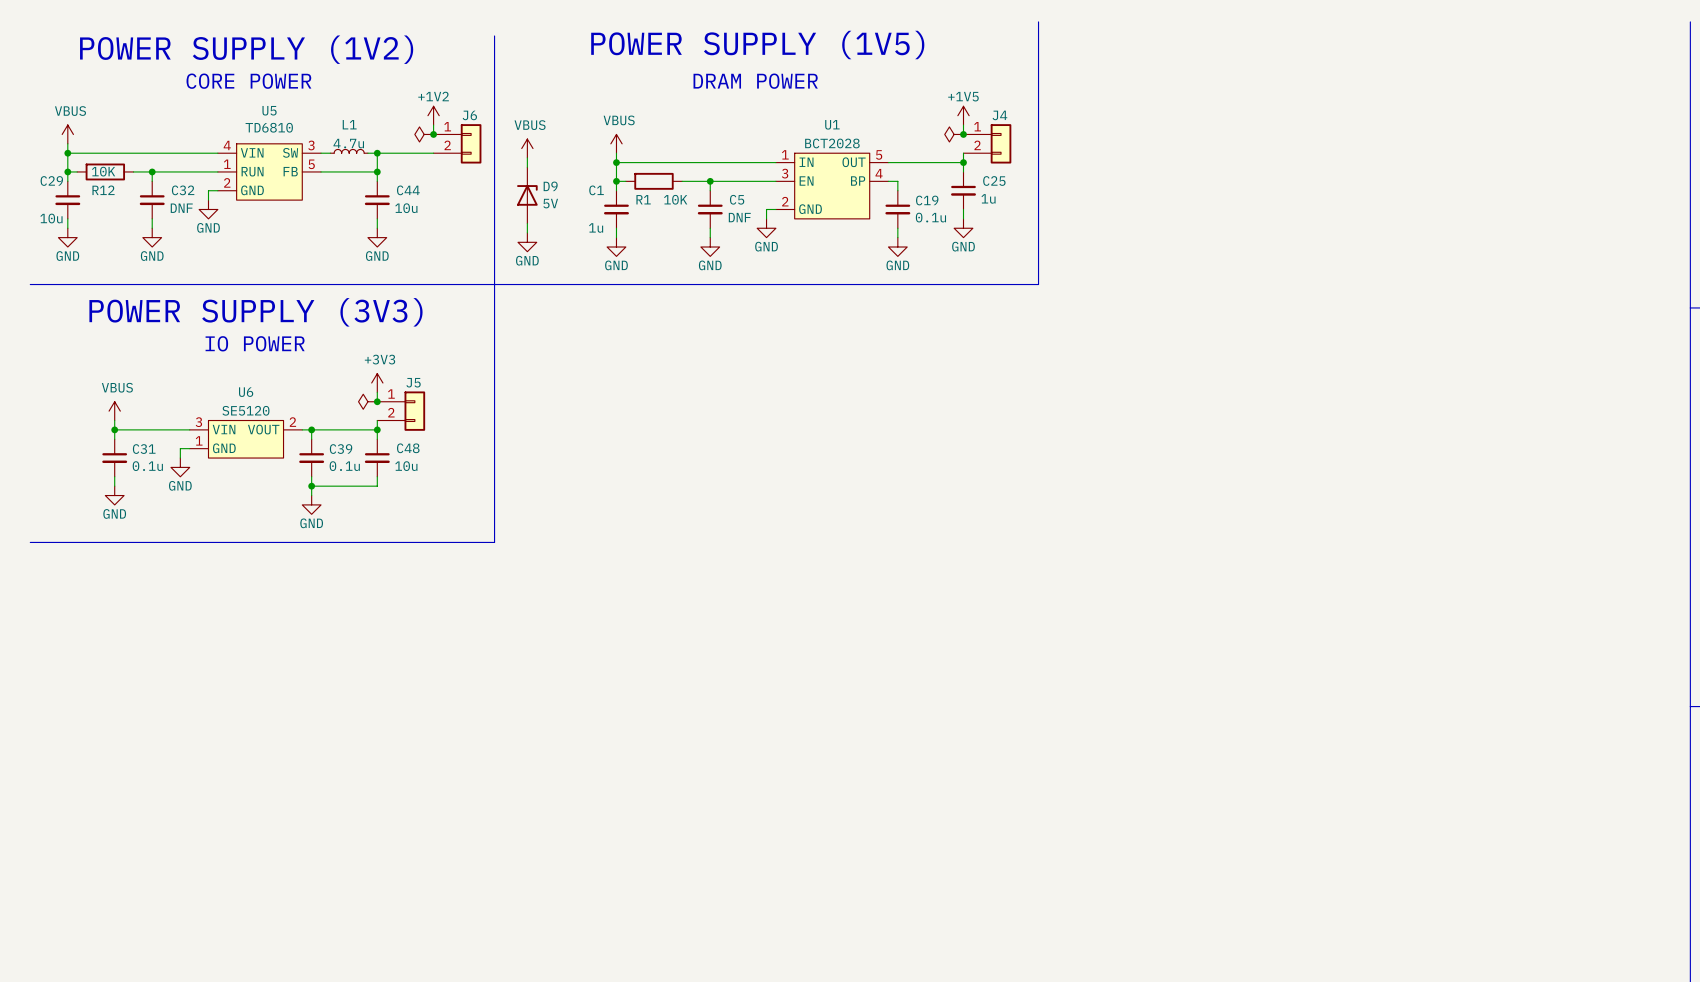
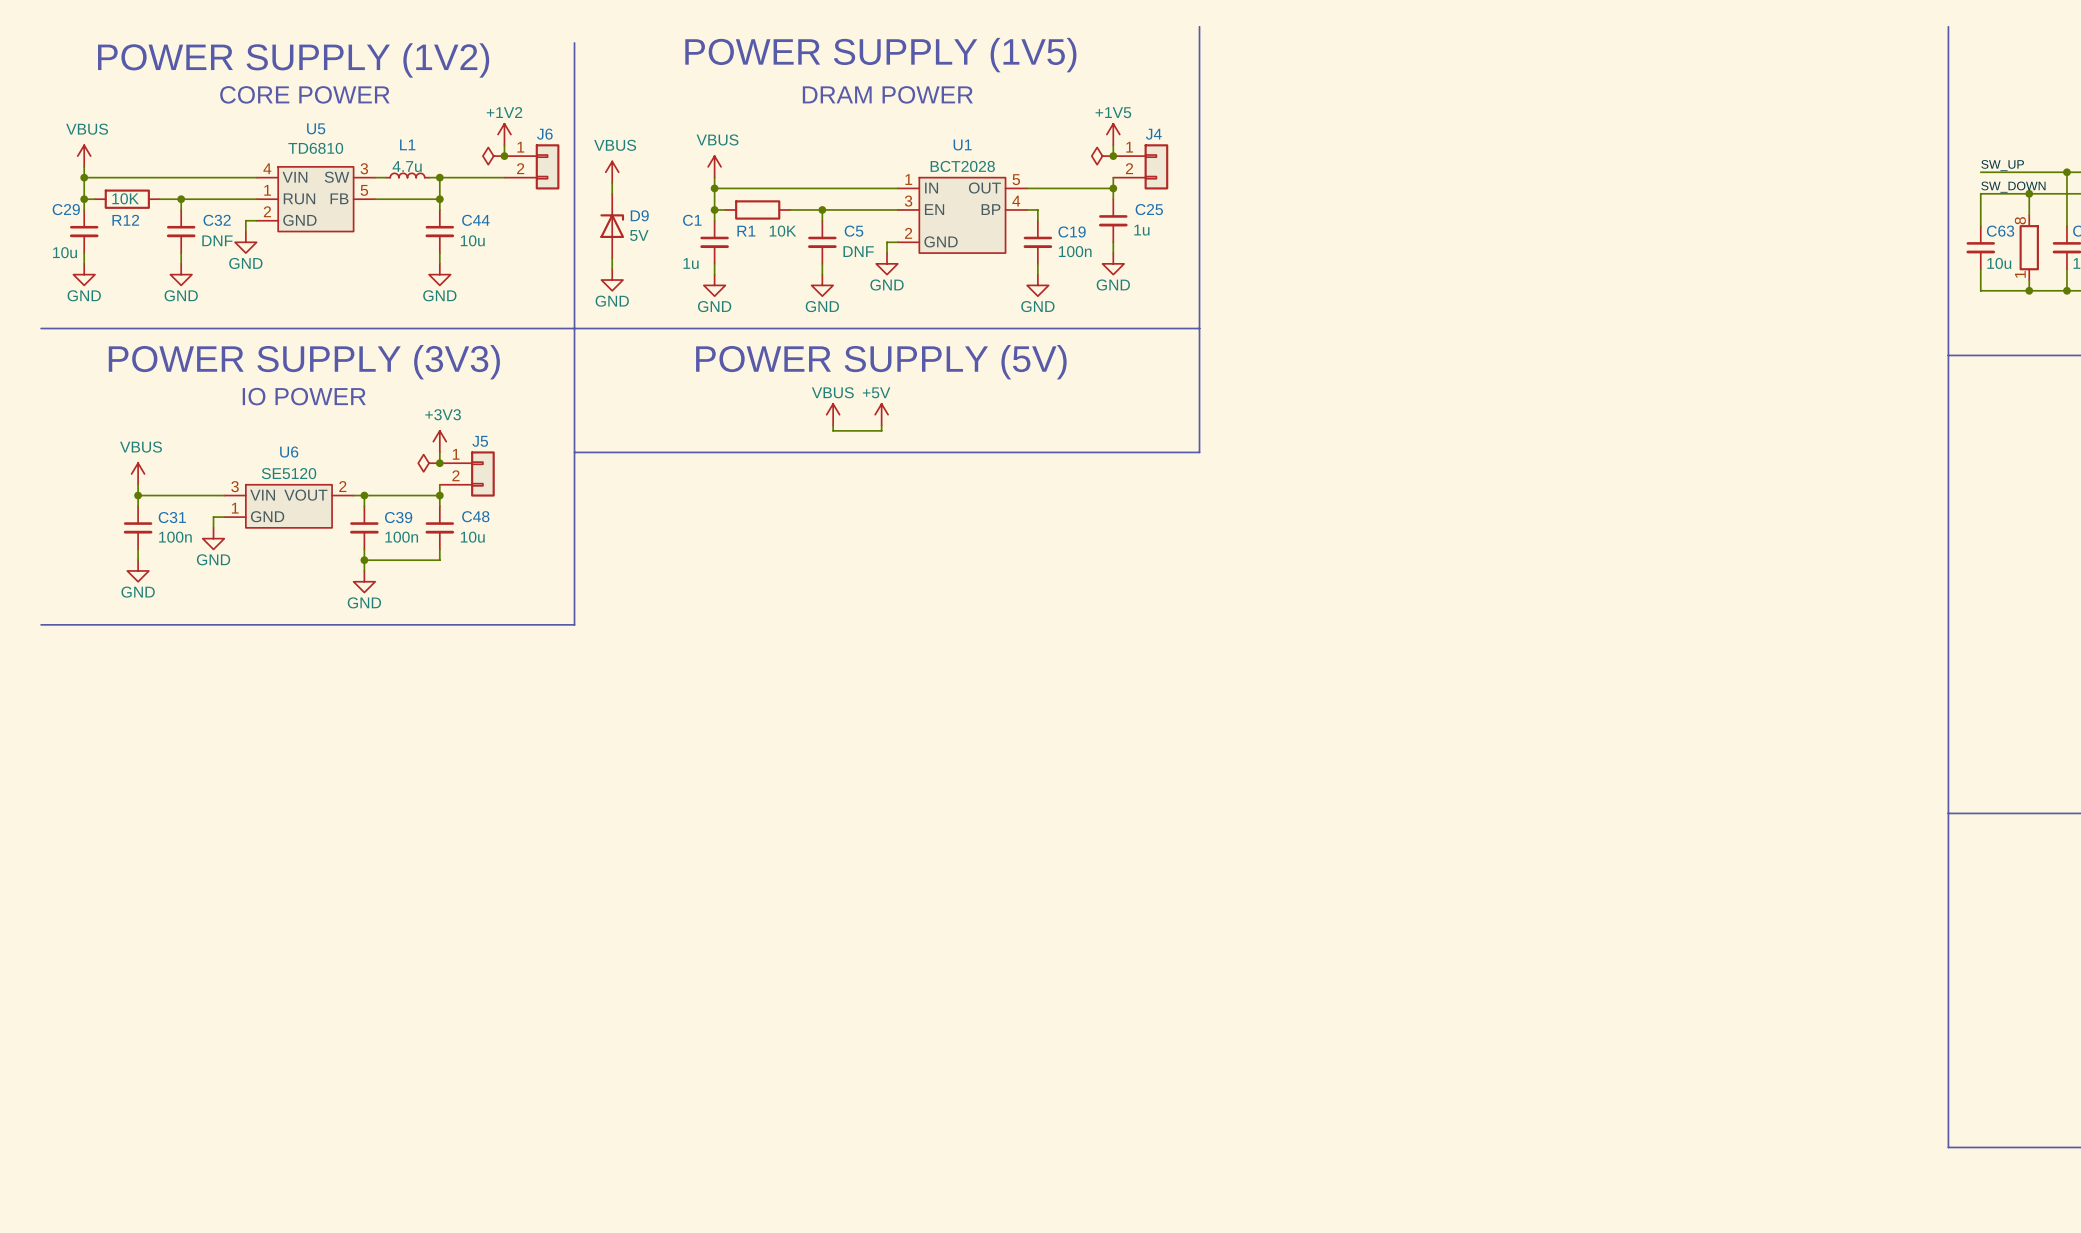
C19 value: 0.1u (930, 217) -> 100n (1075, 251)
line: none -> (1199, 328) (1199, 452) (574, 452)
text: none -> POWER SUPPLY (5V) (881, 362)
power symbol: none -> VBUS (833, 414)
power symbol: none -> +5V (881, 414)
wire: none -> (833, 425) (833, 430) (881, 430) (881, 425)
C31 value: 0.1u (147, 466) -> 100n (175, 537)
C39 value: 0.1u (344, 466) -> 100n (401, 537)

